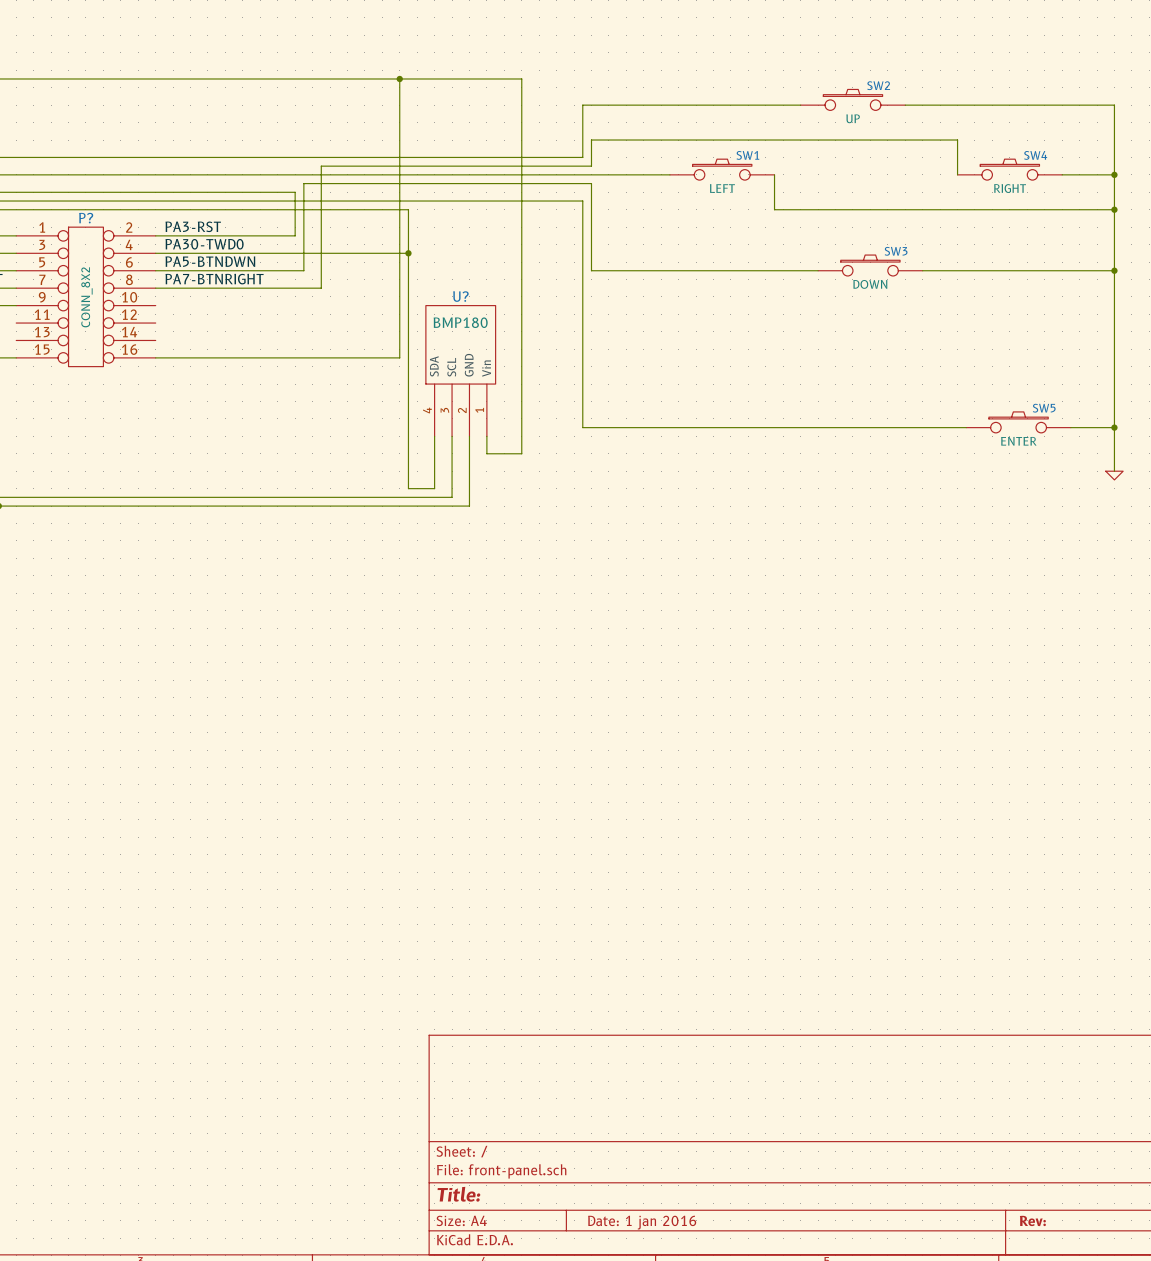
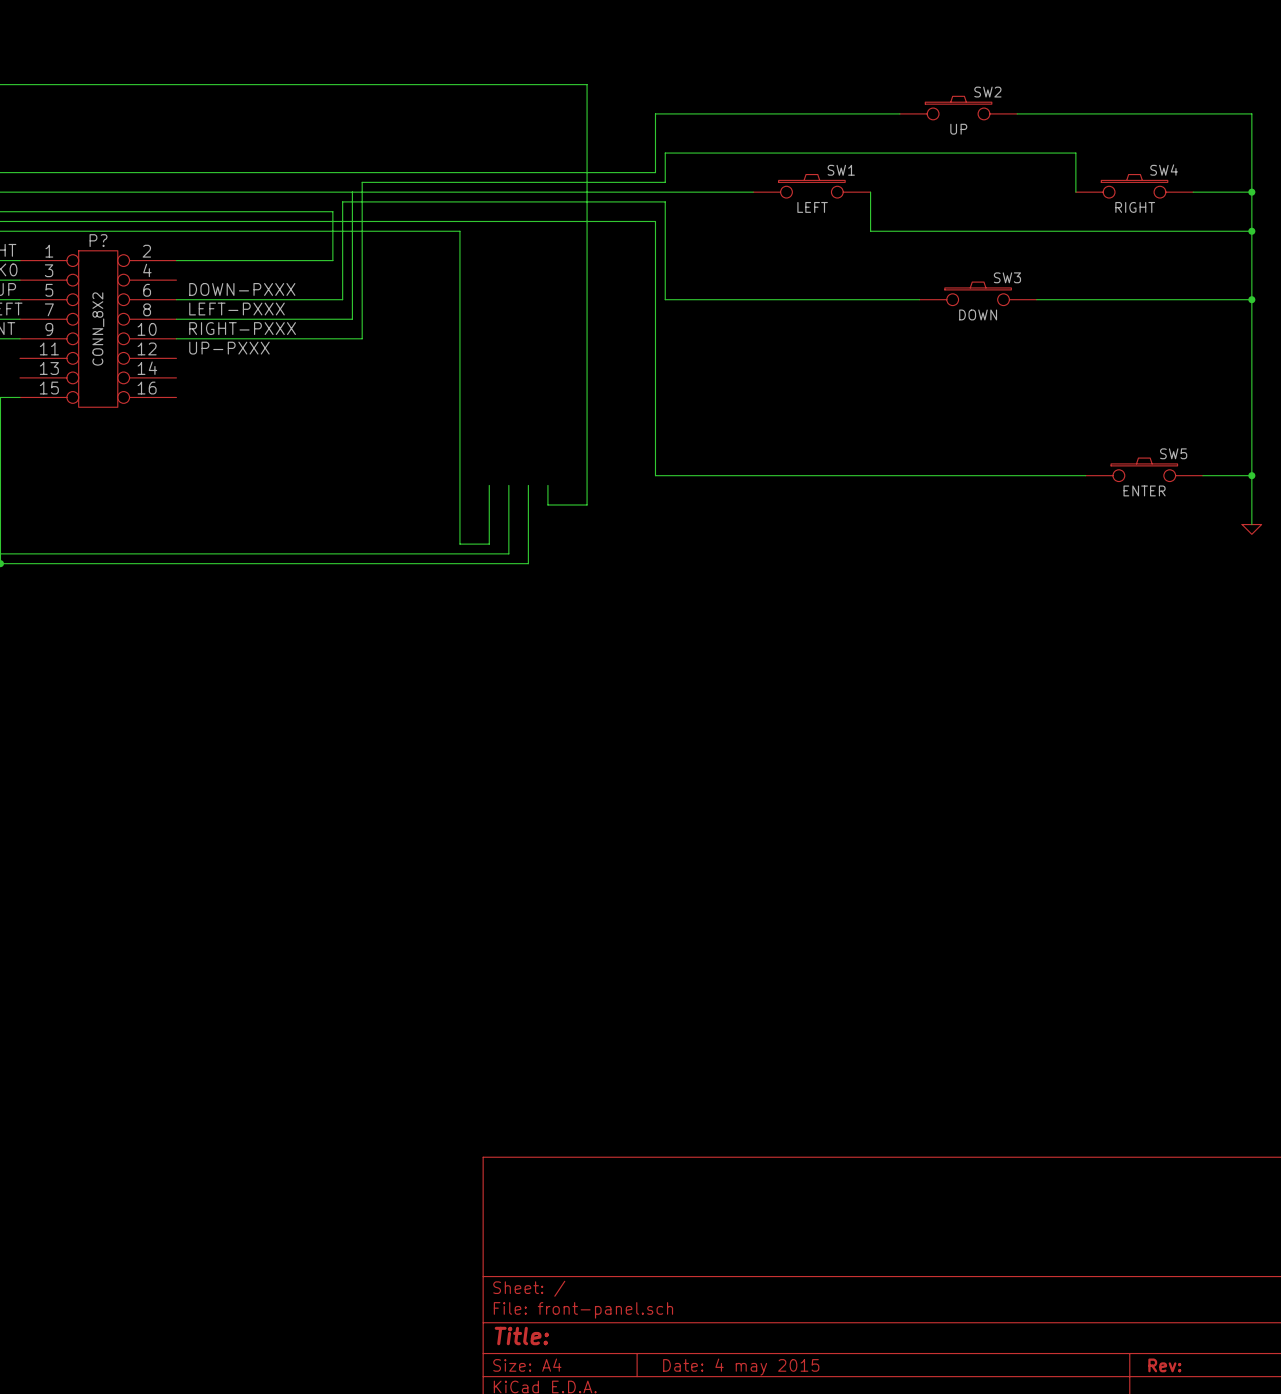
wire: (399, 78) (399, 357) (155, 357) -> none
junction: (399, 78) -> none
label: PA3-RST (193, 226) -> none
label: PA30-TWD0 (204, 244) -> none
wire: (155, 253) (408, 253) -> none
junction: (408, 253) -> none
label: PA5-BTNDWN (210, 261) -> DOWN-PXXX (242, 289)
label: PA7-BTNRIGHT (214, 279) -> LEFT-PXXX (236, 309)
wire: (312, 288) (321, 288) -> (352, 319) (352, 192)
wire: none -> (362, 319) (362, 338) (176, 338)
label: none -> RIGHT-PXXX (242, 328)
label: none -> UP-PXXX (229, 348)
U?: BMP180 (460, 370) -> none
title block: Date: 1 jan 2016 (642, 1222) -> Date: 4 may 2015 (741, 1367)

